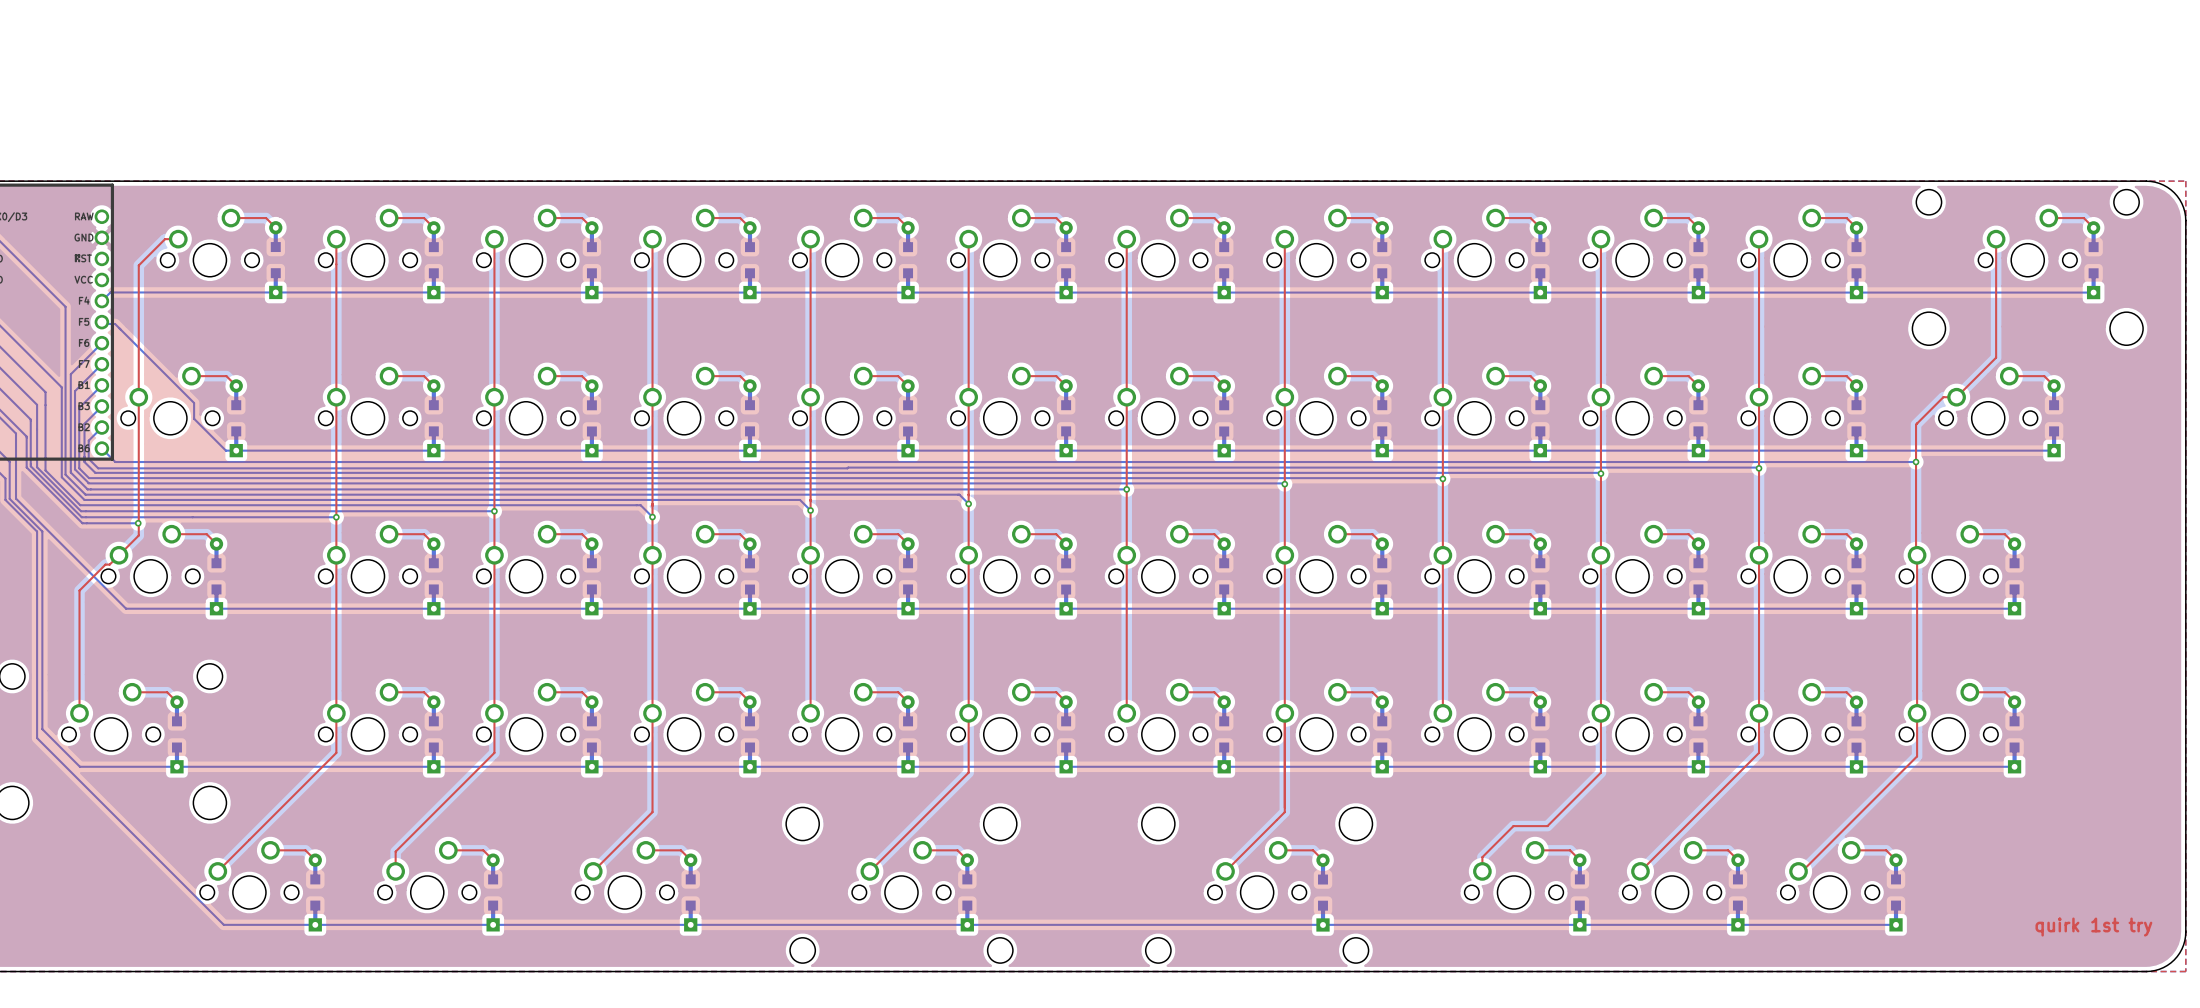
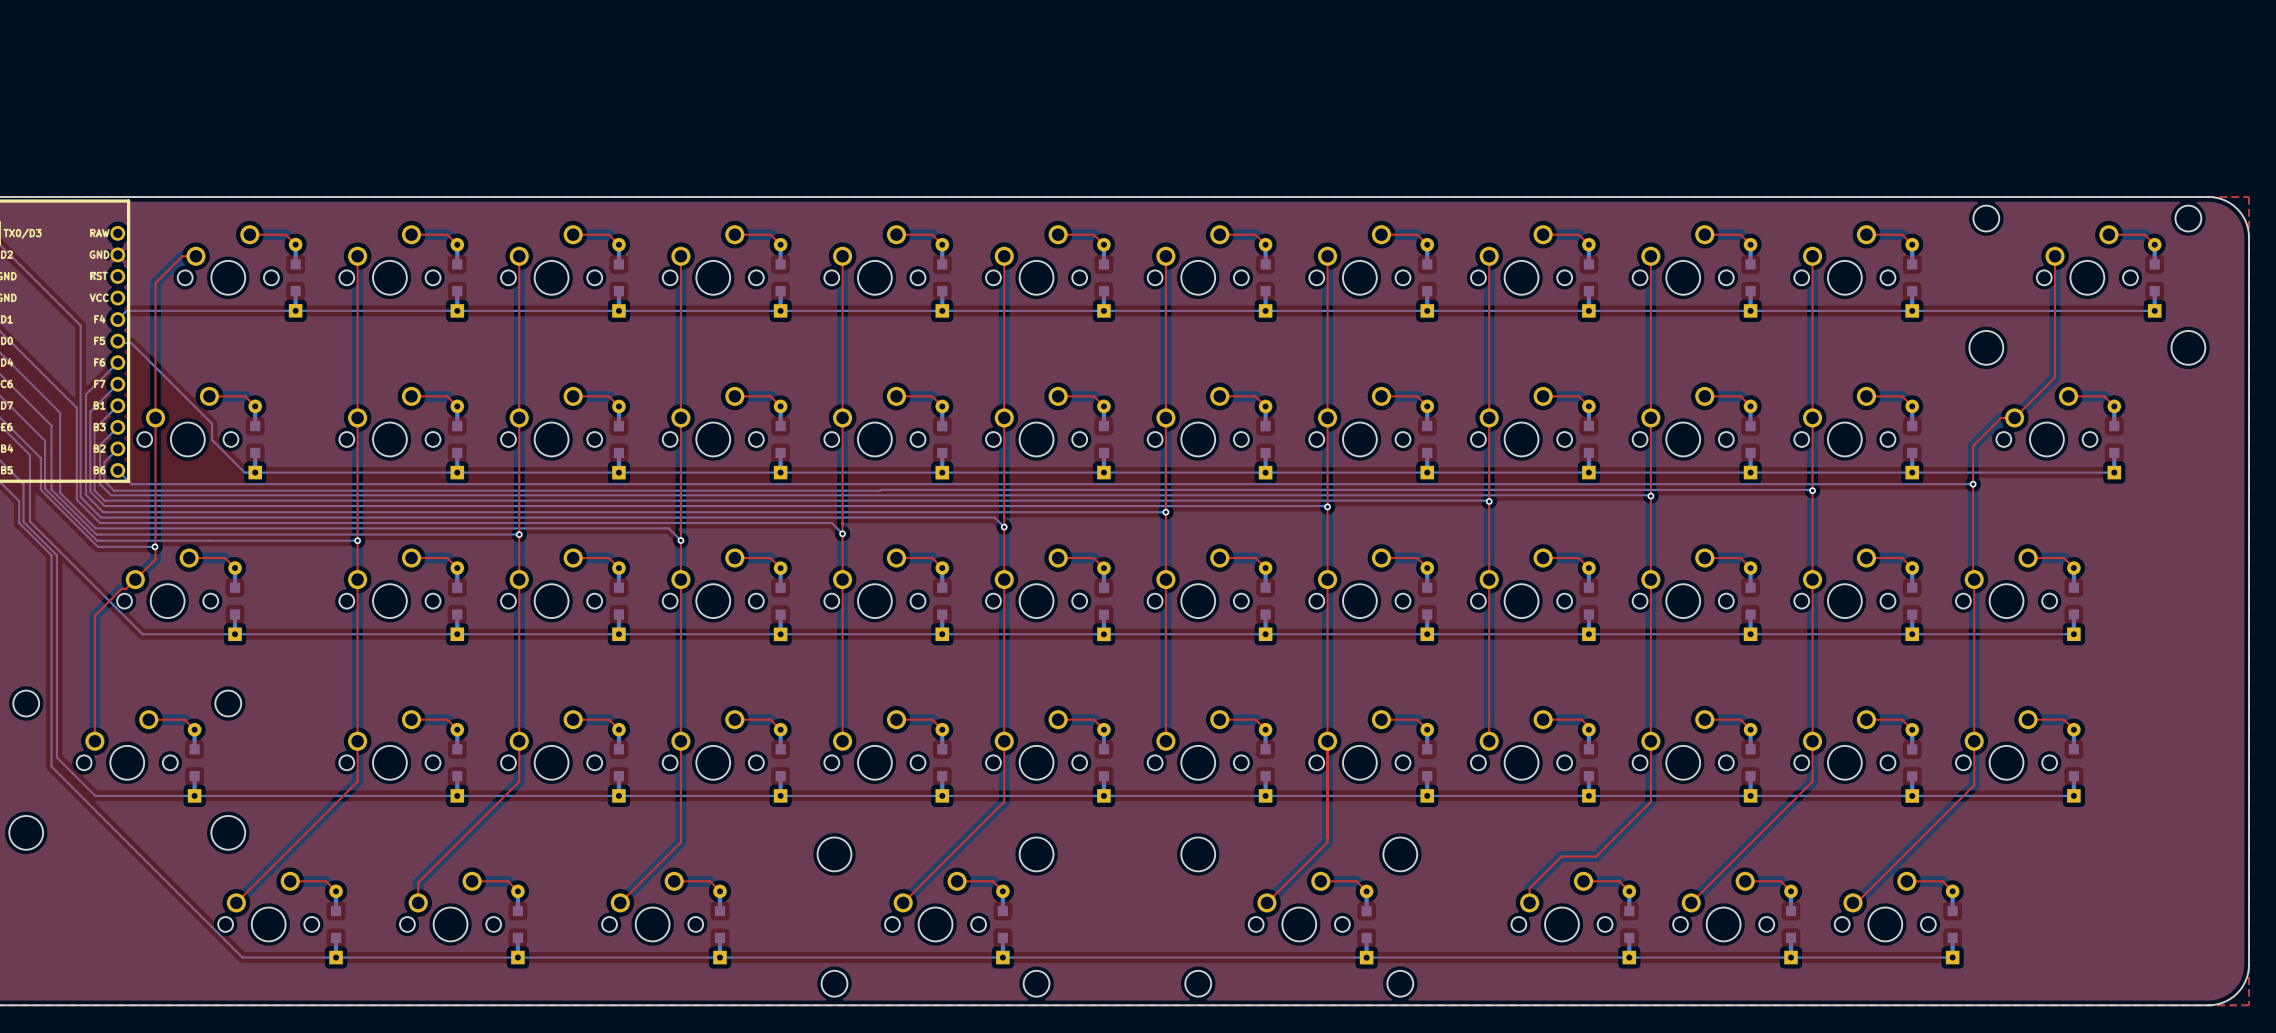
text: quirk 1st try (2093, 927) -> none

